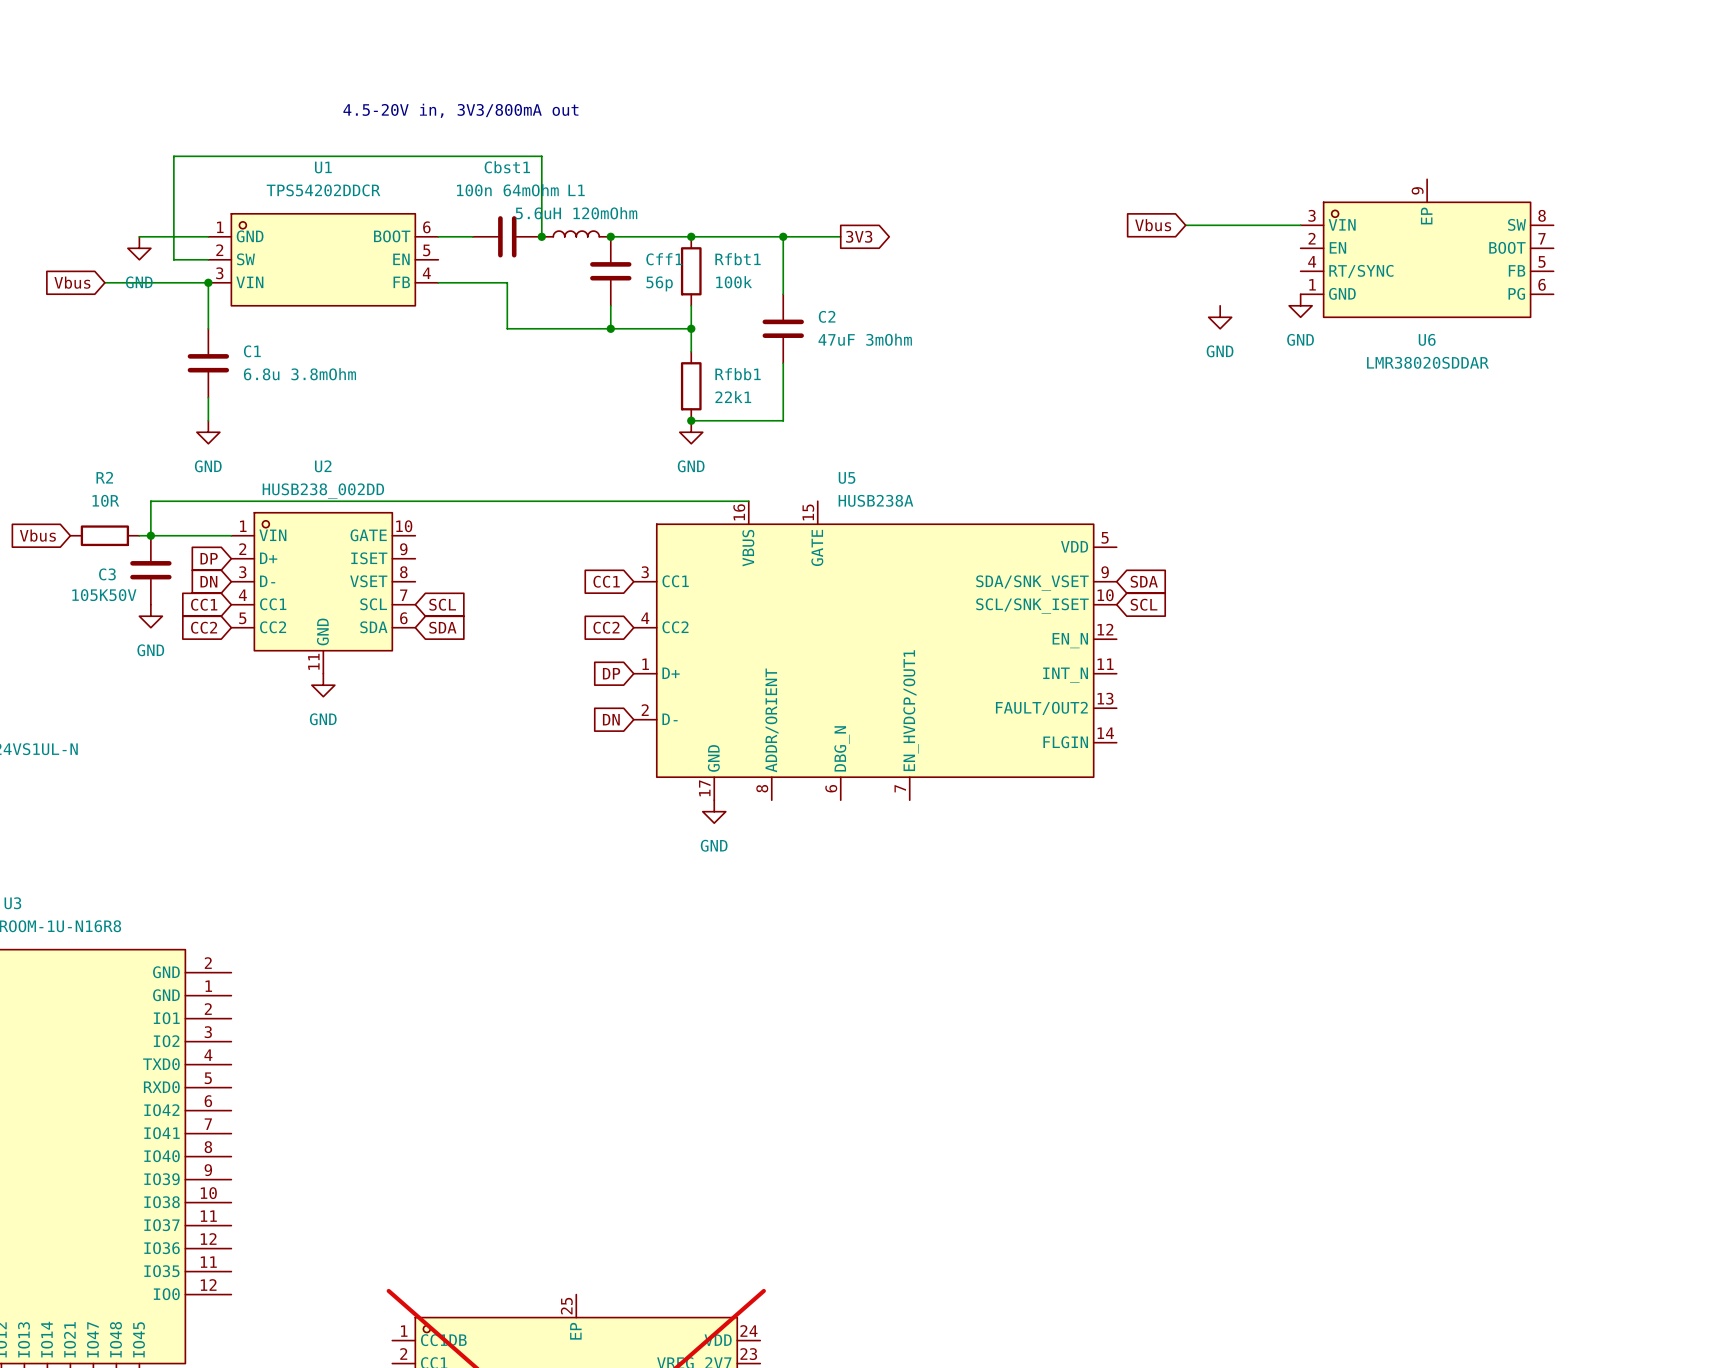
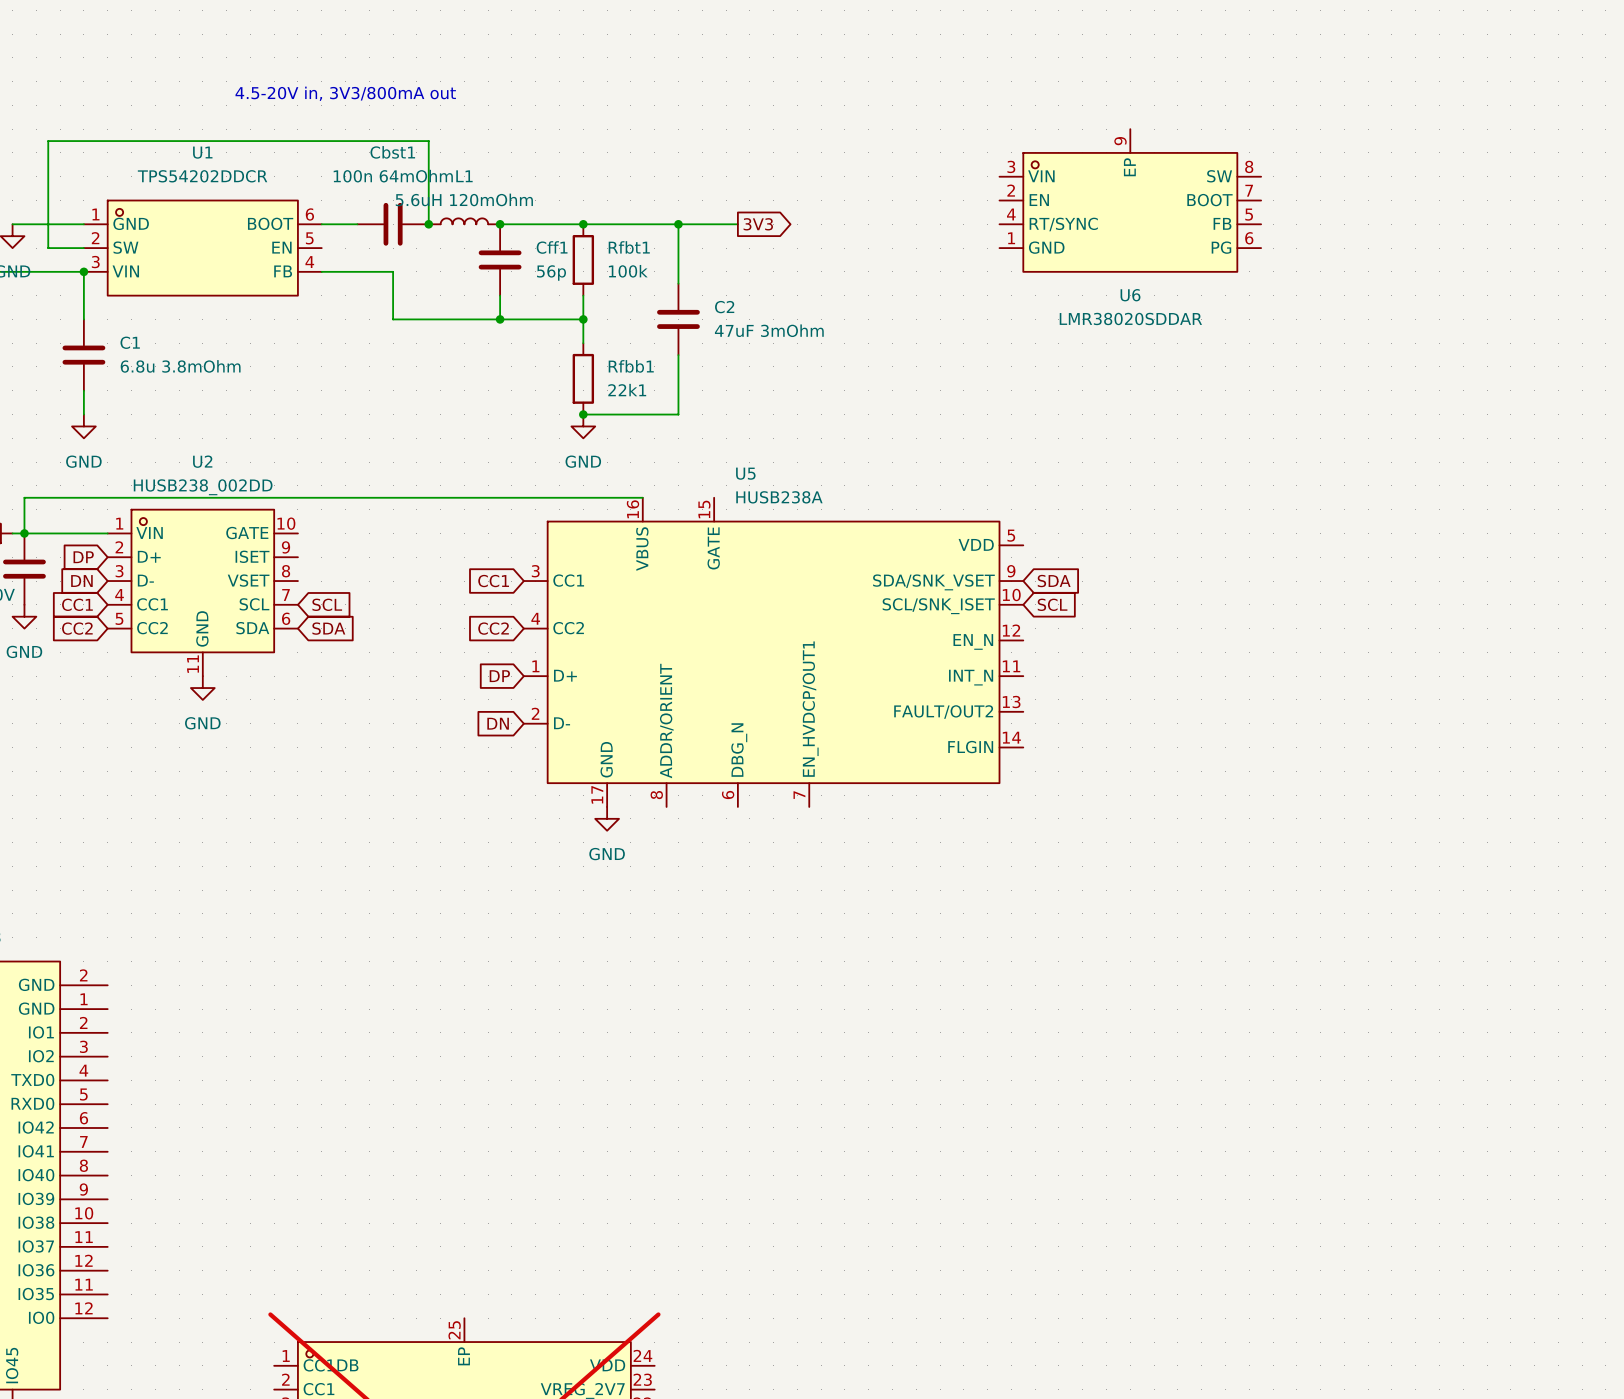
global label: Vbus (1153, 225) -> none
U6 position: (1427, 248) -> (1130, 200)
power symbol: GND (1300, 305) -> none
power symbol: GND (1220, 317) -> none

